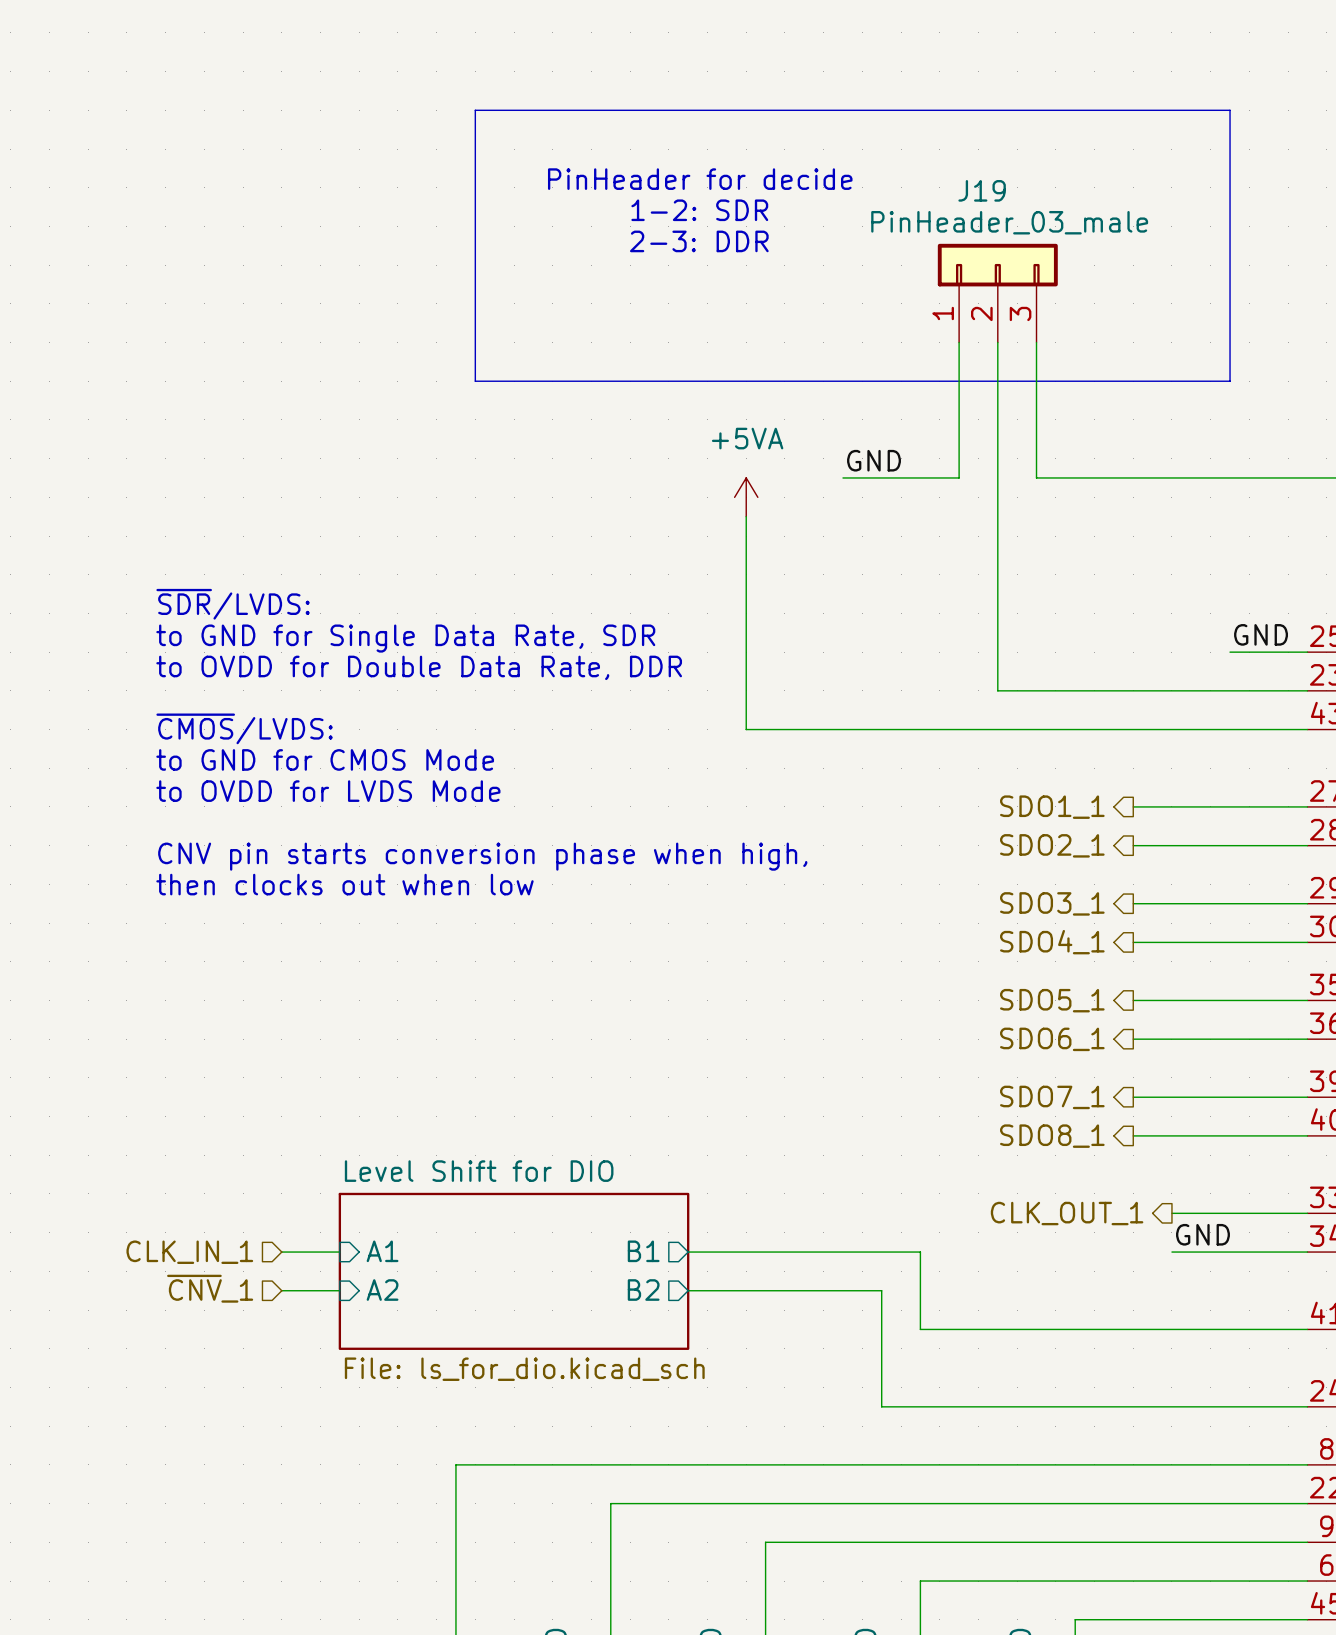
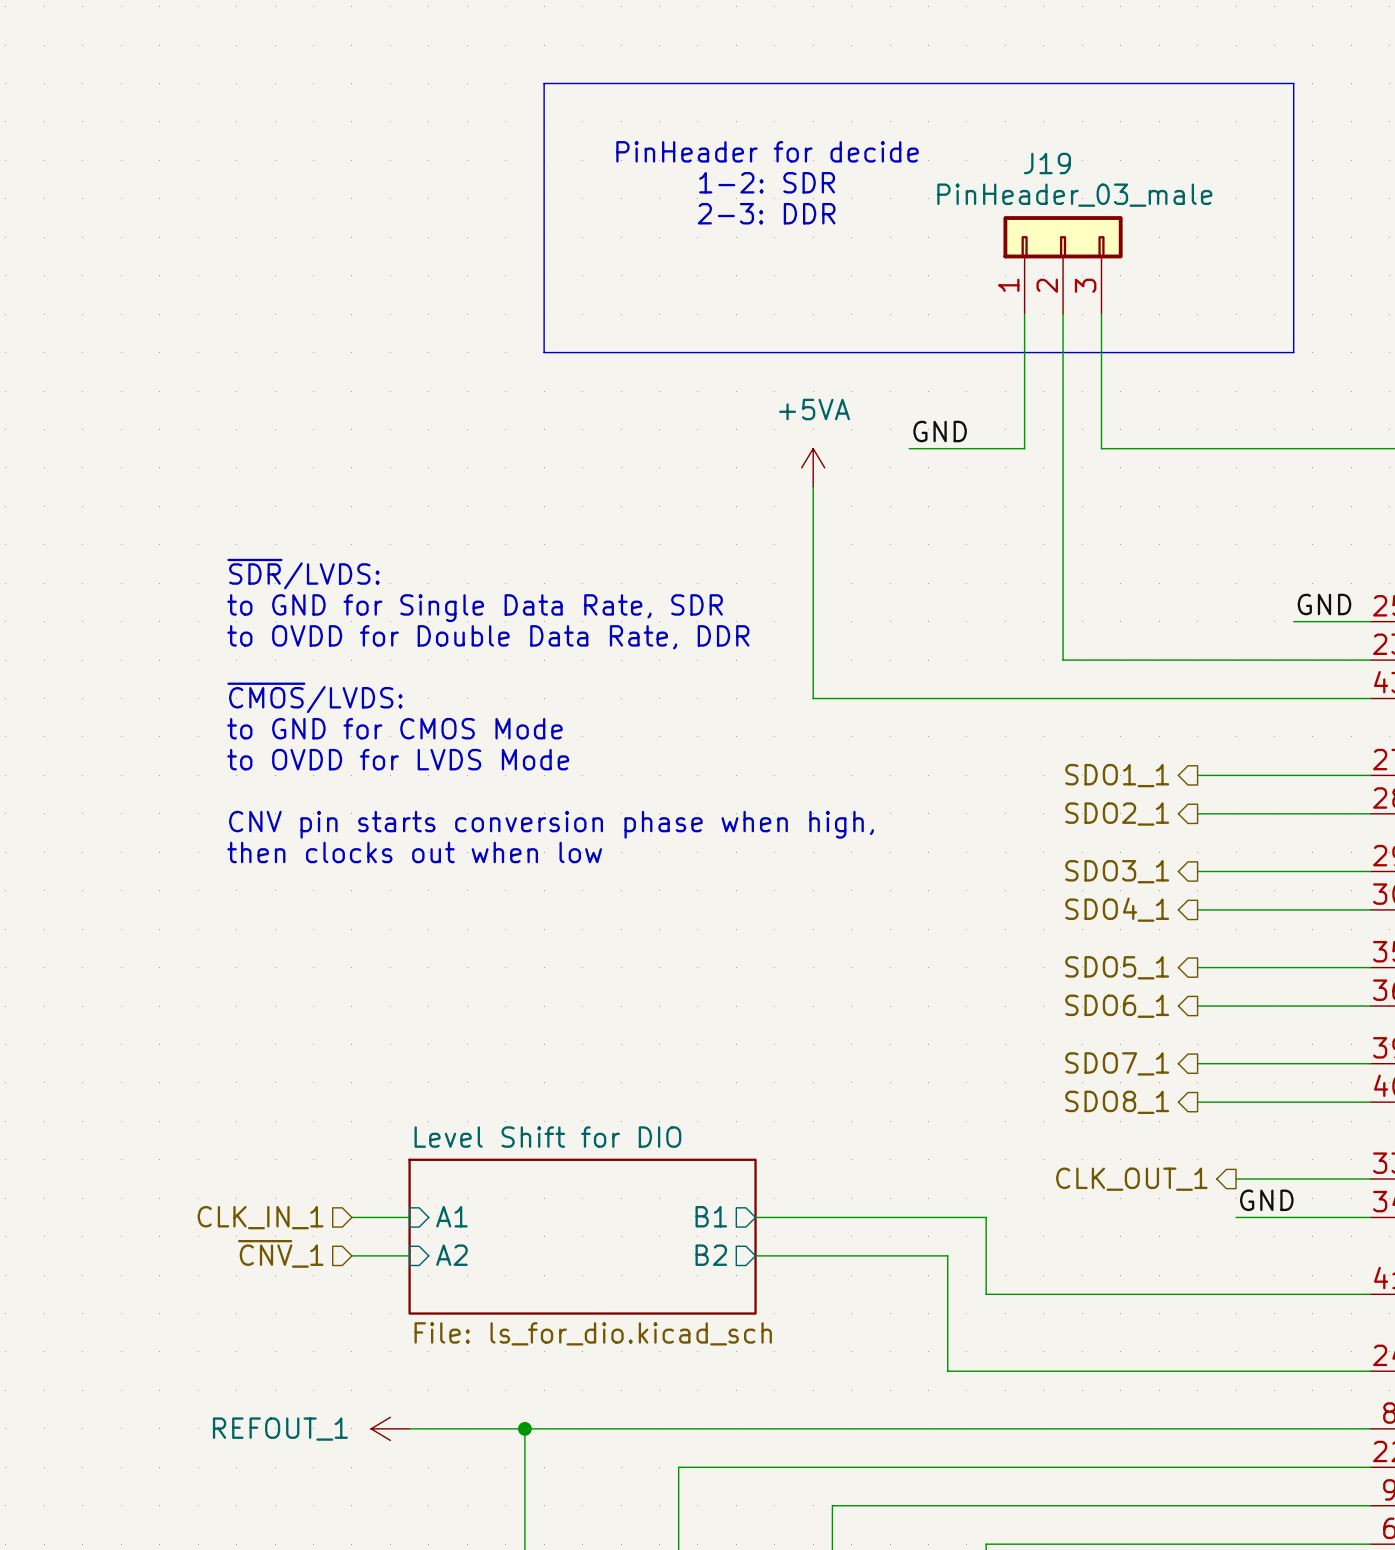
power symbol: none -> REFOUT_1 (390, 1428)
wire: none -> (409, 1428) (524, 1428)
junction: none -> (524, 1428)

